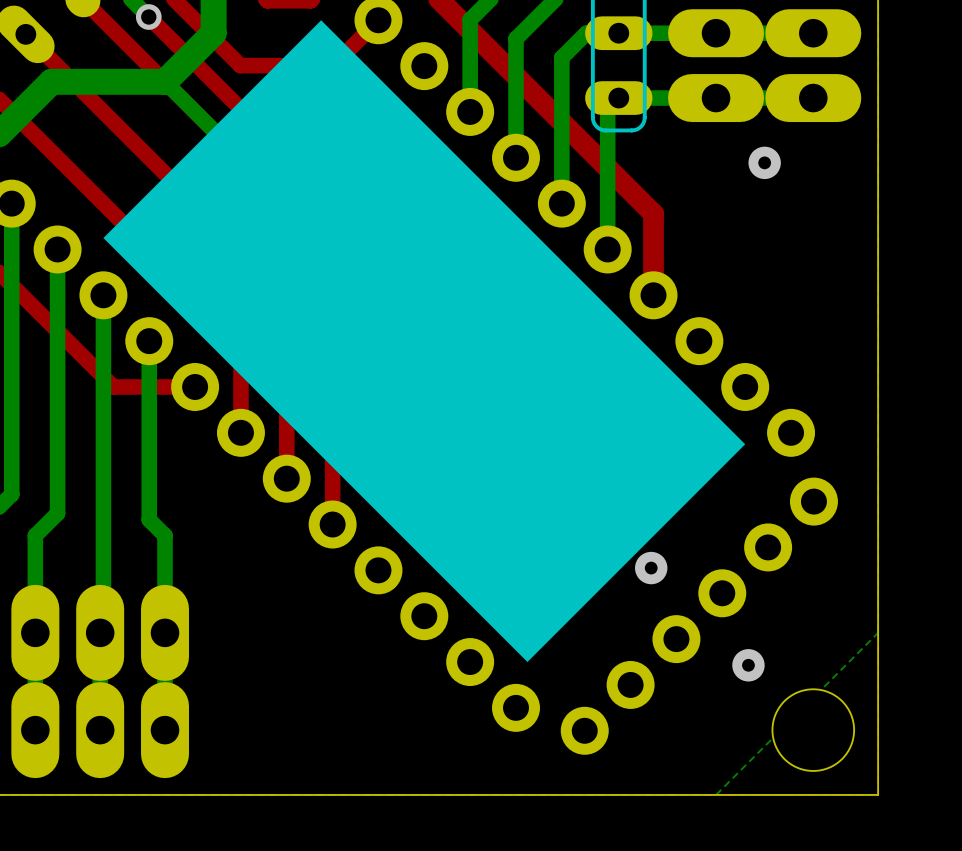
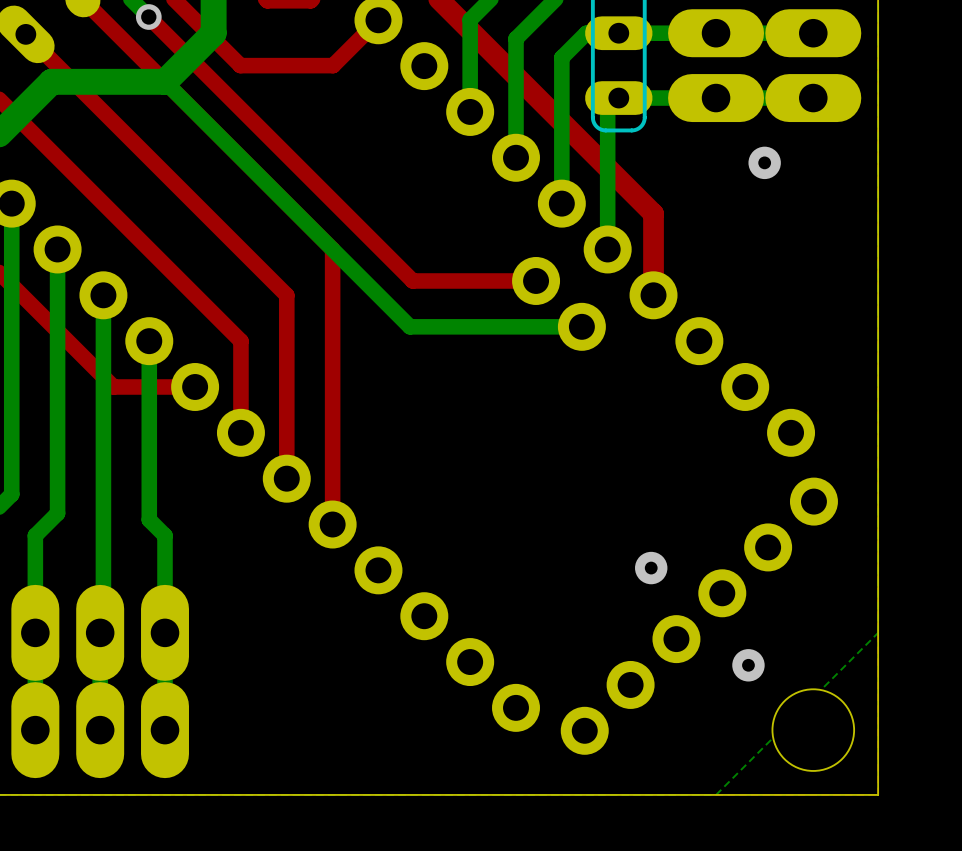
drawing: [103, 20, 746, 663] -> none

